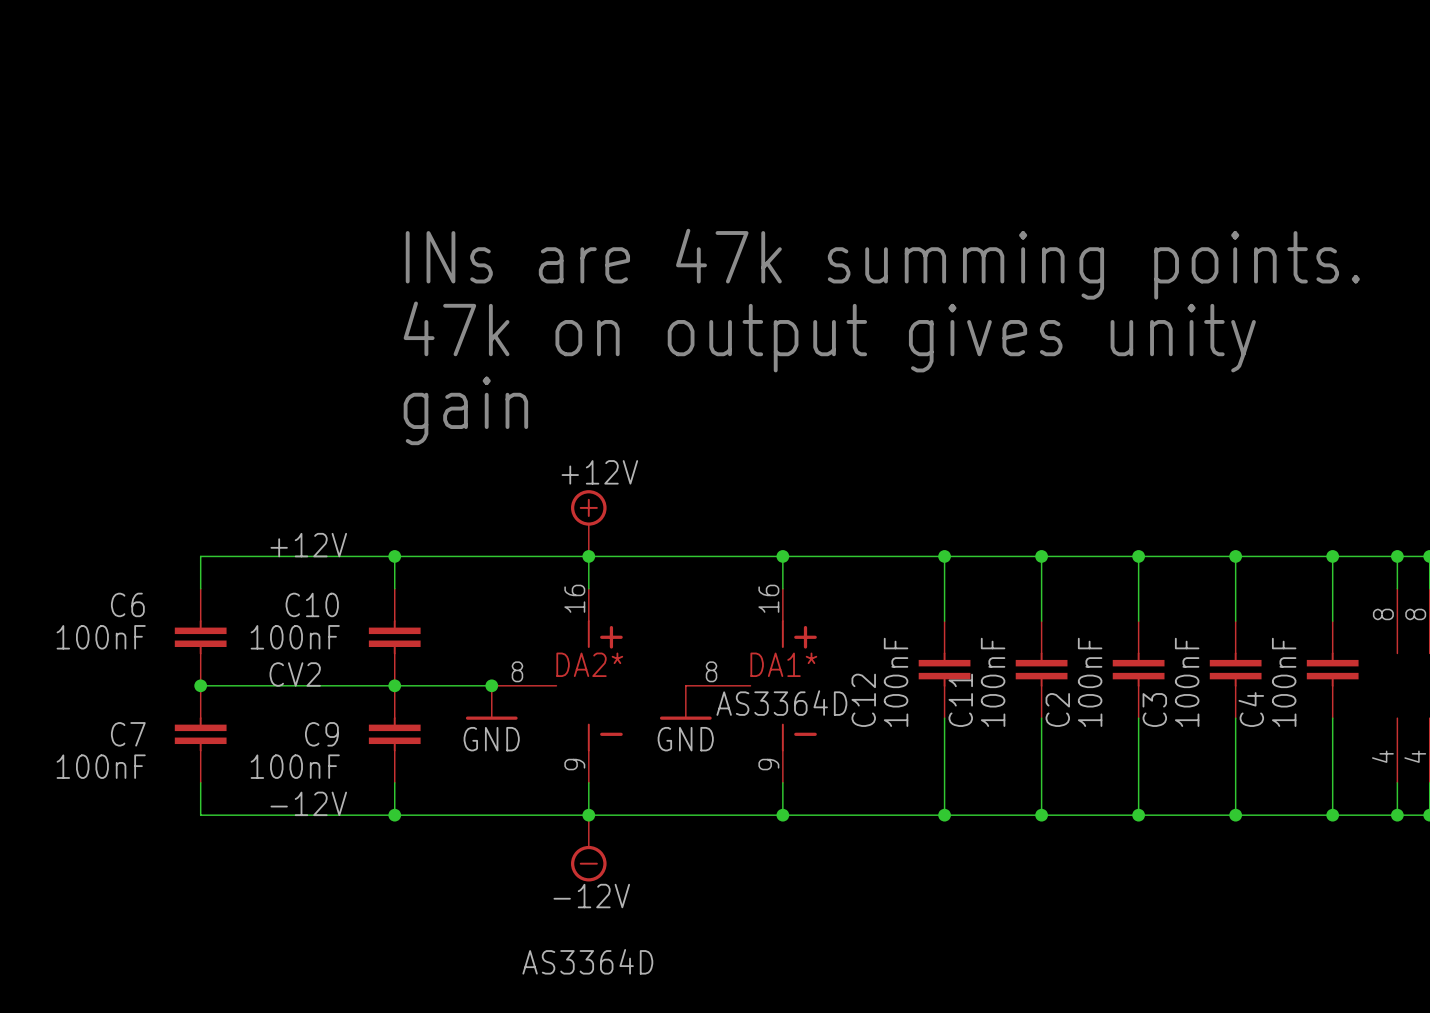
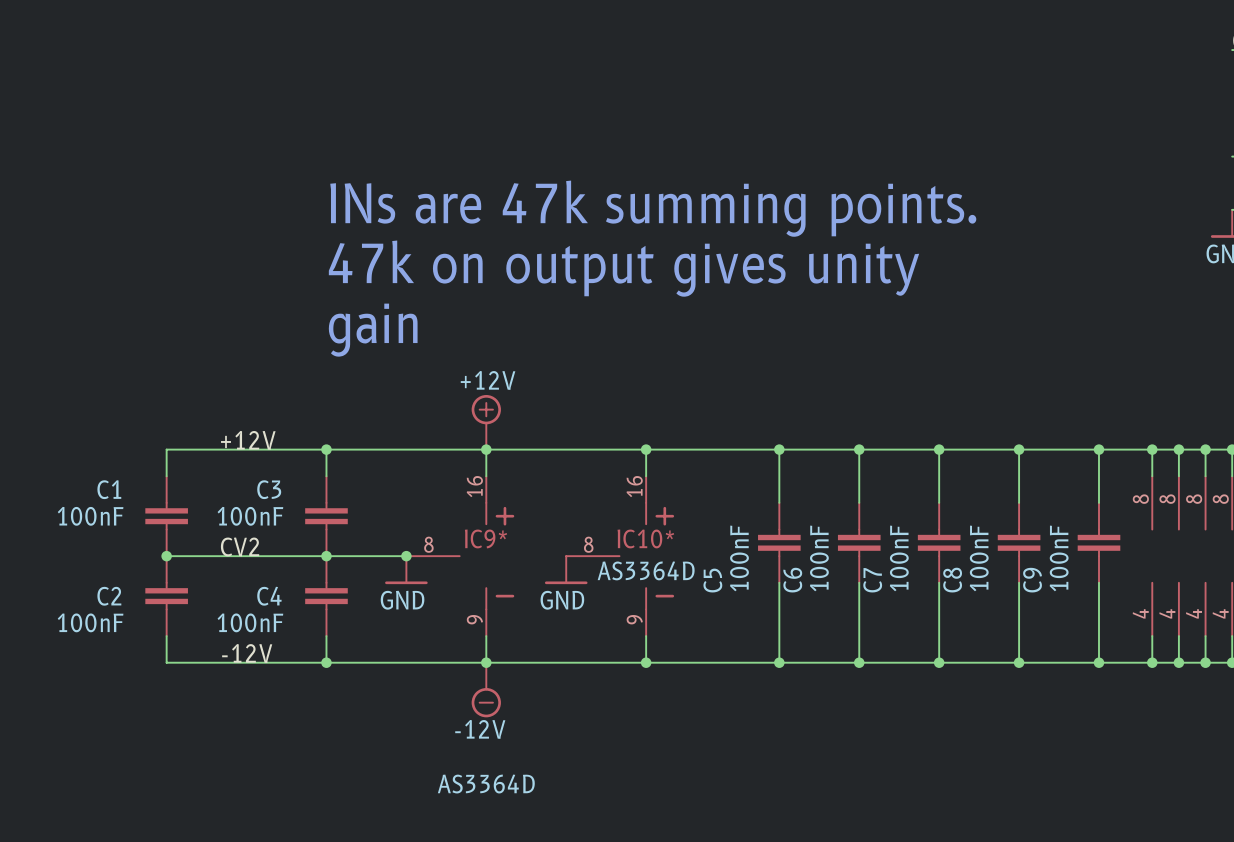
C6 name: C6 (127, 604) -> C1 (109, 489)
C10 name: C10 (312, 604) -> C3 (269, 489)
DA2* name: DA2* (589, 664) -> IC9* (486, 538)
DA1* name: DA1* (783, 664) -> IC10* (645, 538)
C12 name: C12 (863, 700) -> C5 (712, 580)
C11 name: C11 (960, 700) -> C6 (792, 580)
C4 name: C4 (1251, 709) -> C9 (1032, 580)
C2 name: C2 (1057, 710) -> C7 (872, 580)
C3 name: C3 (1154, 710) -> C8 (952, 580)
C7 name: C7 (128, 734) -> C2 (109, 596)
C9 name: C9 (321, 734) -> C4 (269, 596)

